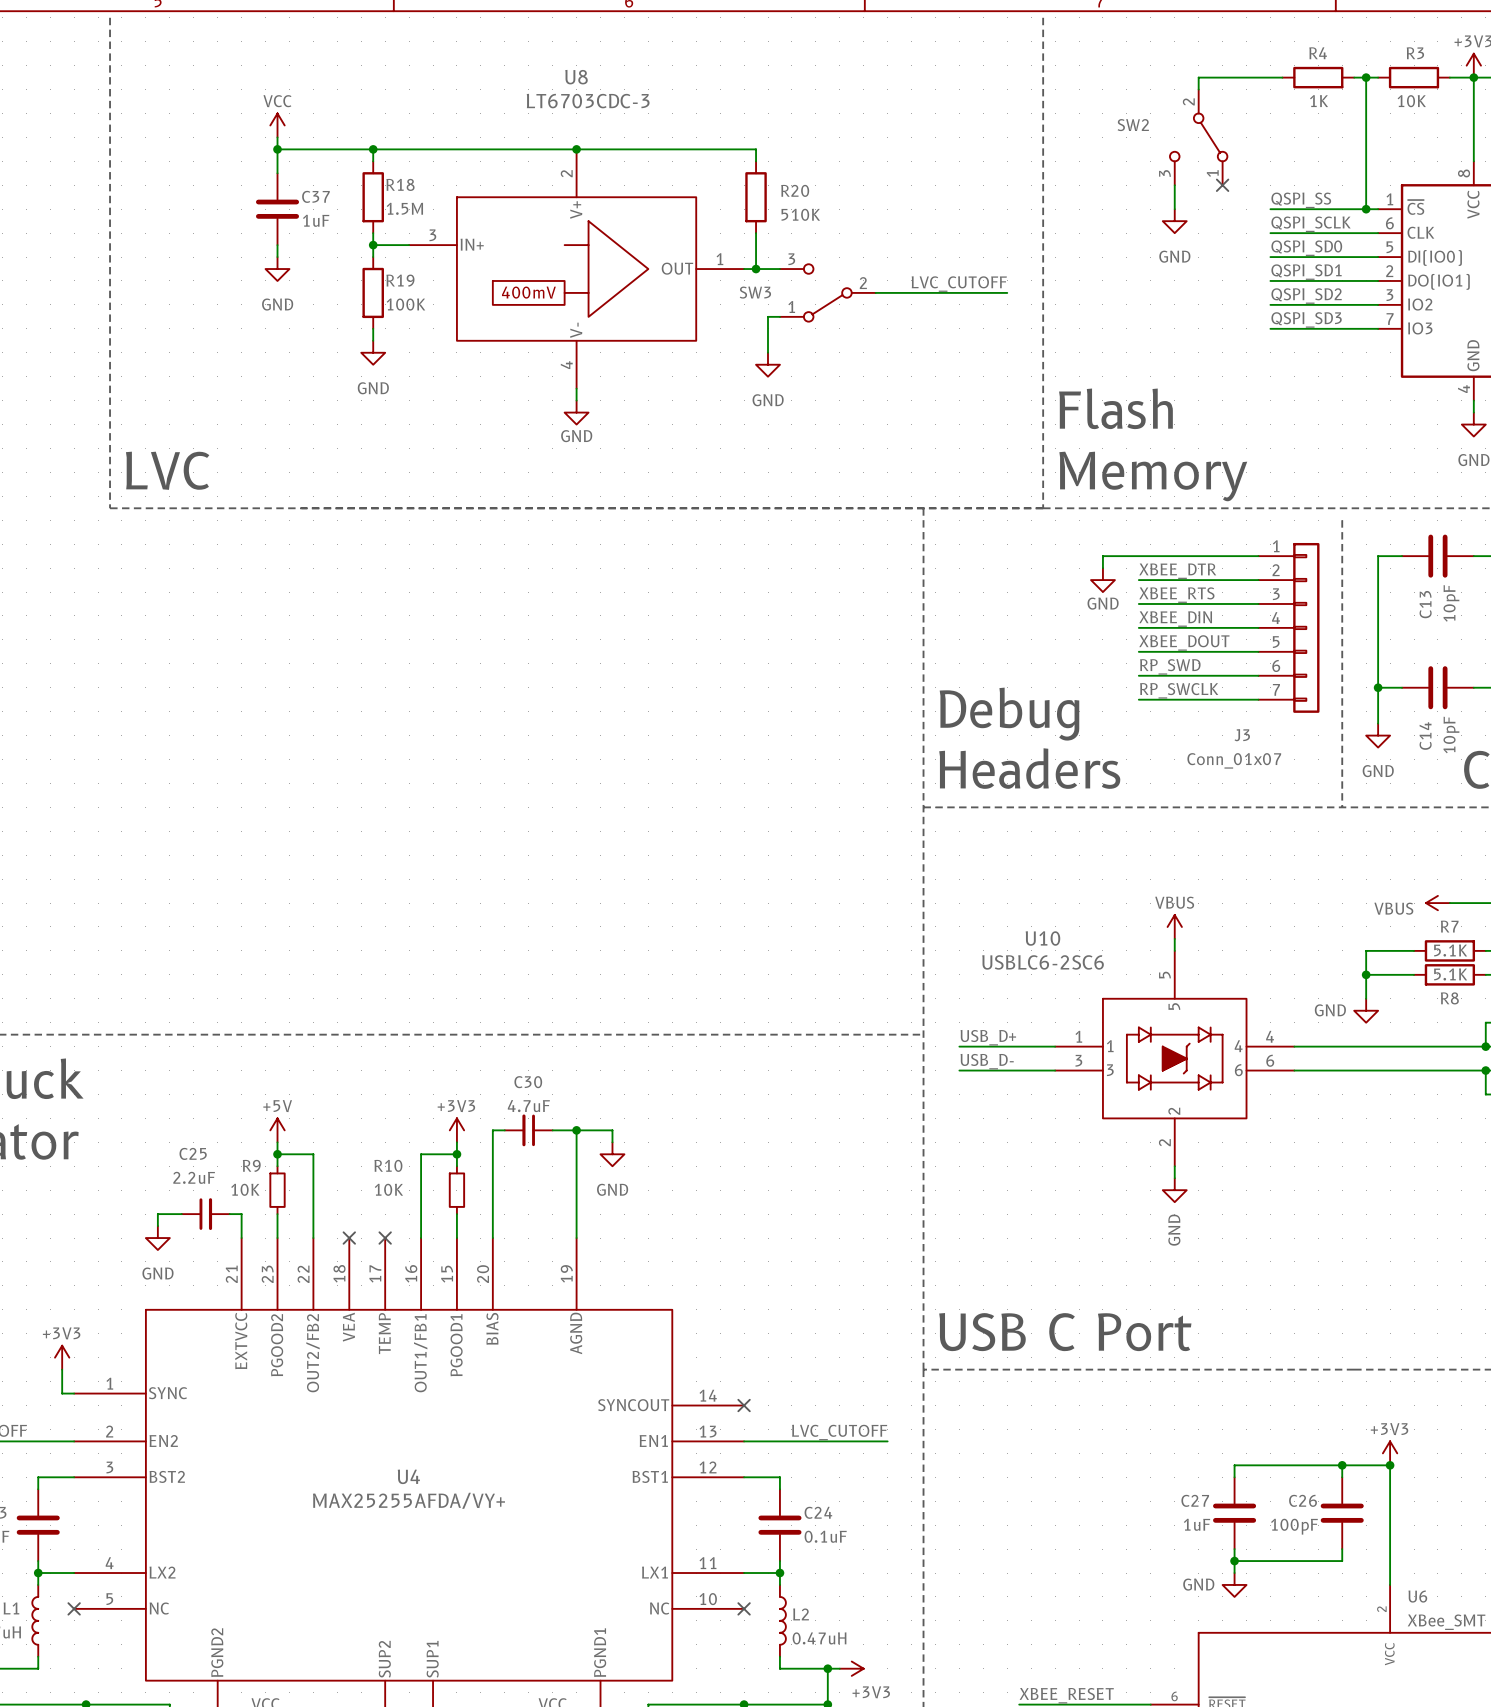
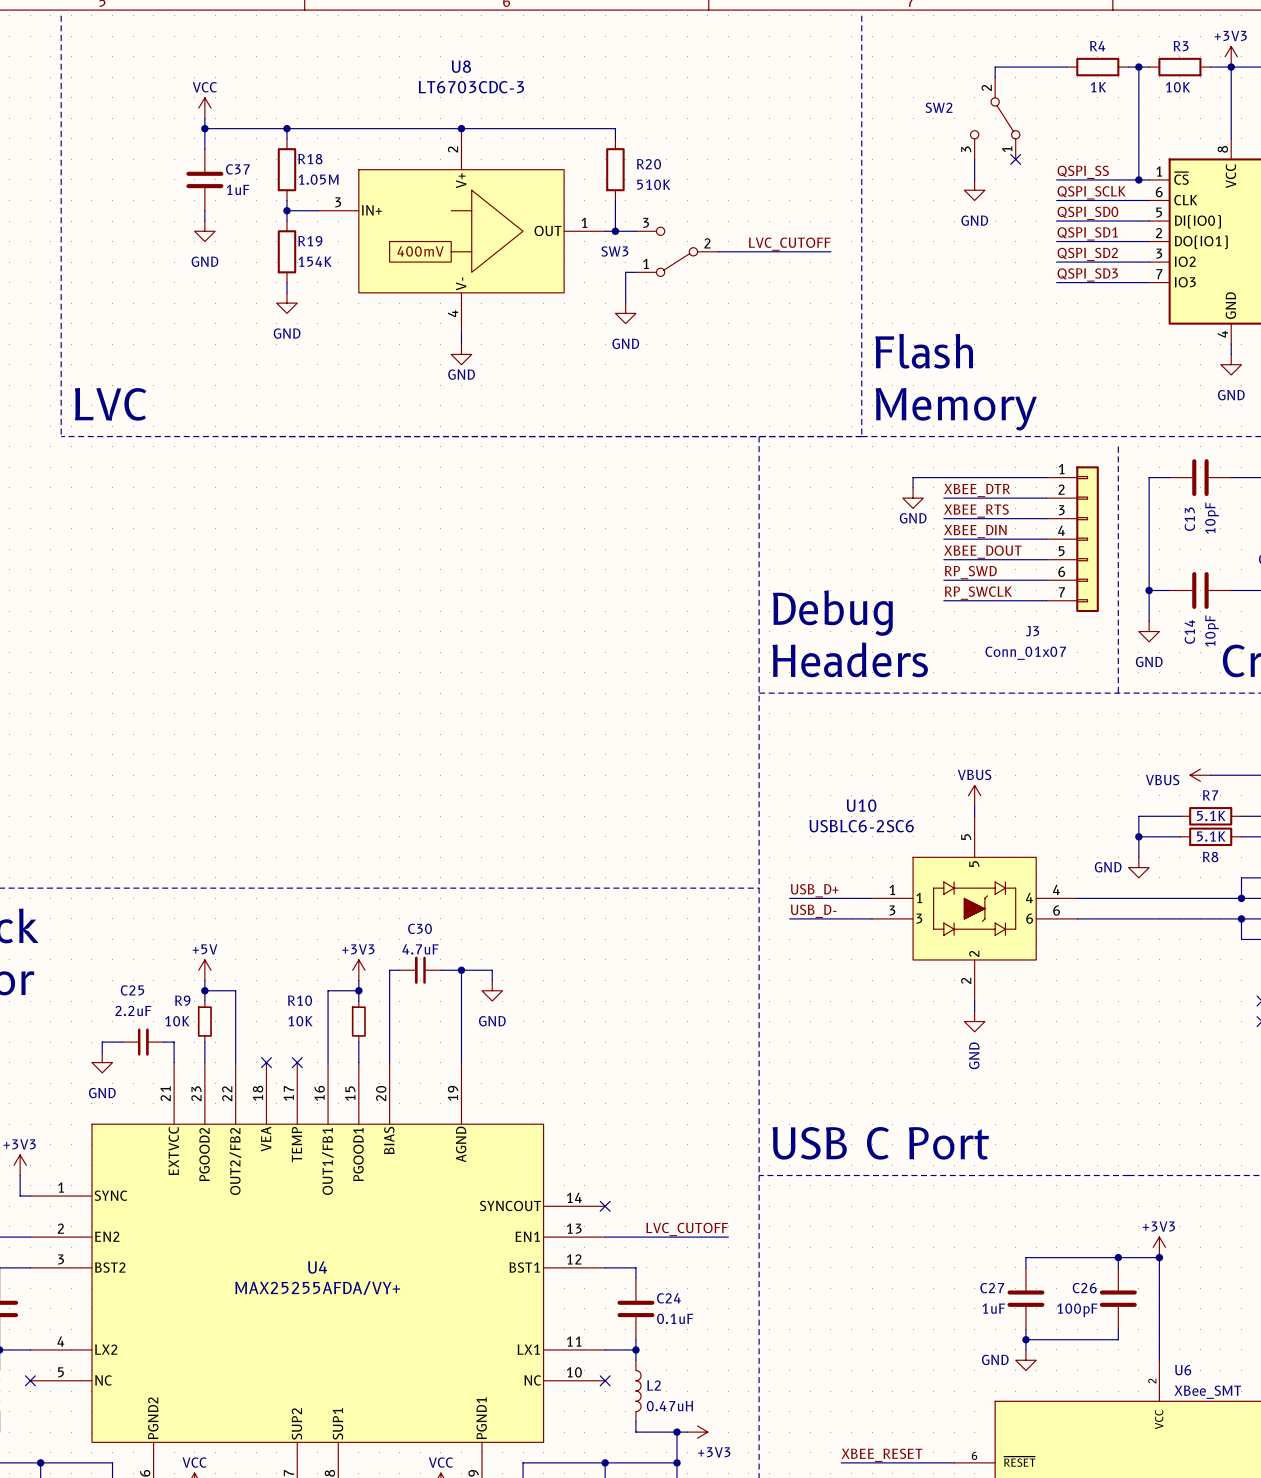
R18 value: 1.5M (404, 208) -> 1.05M (318, 179)
R19 value: 100K (405, 304) -> 154K (315, 261)

